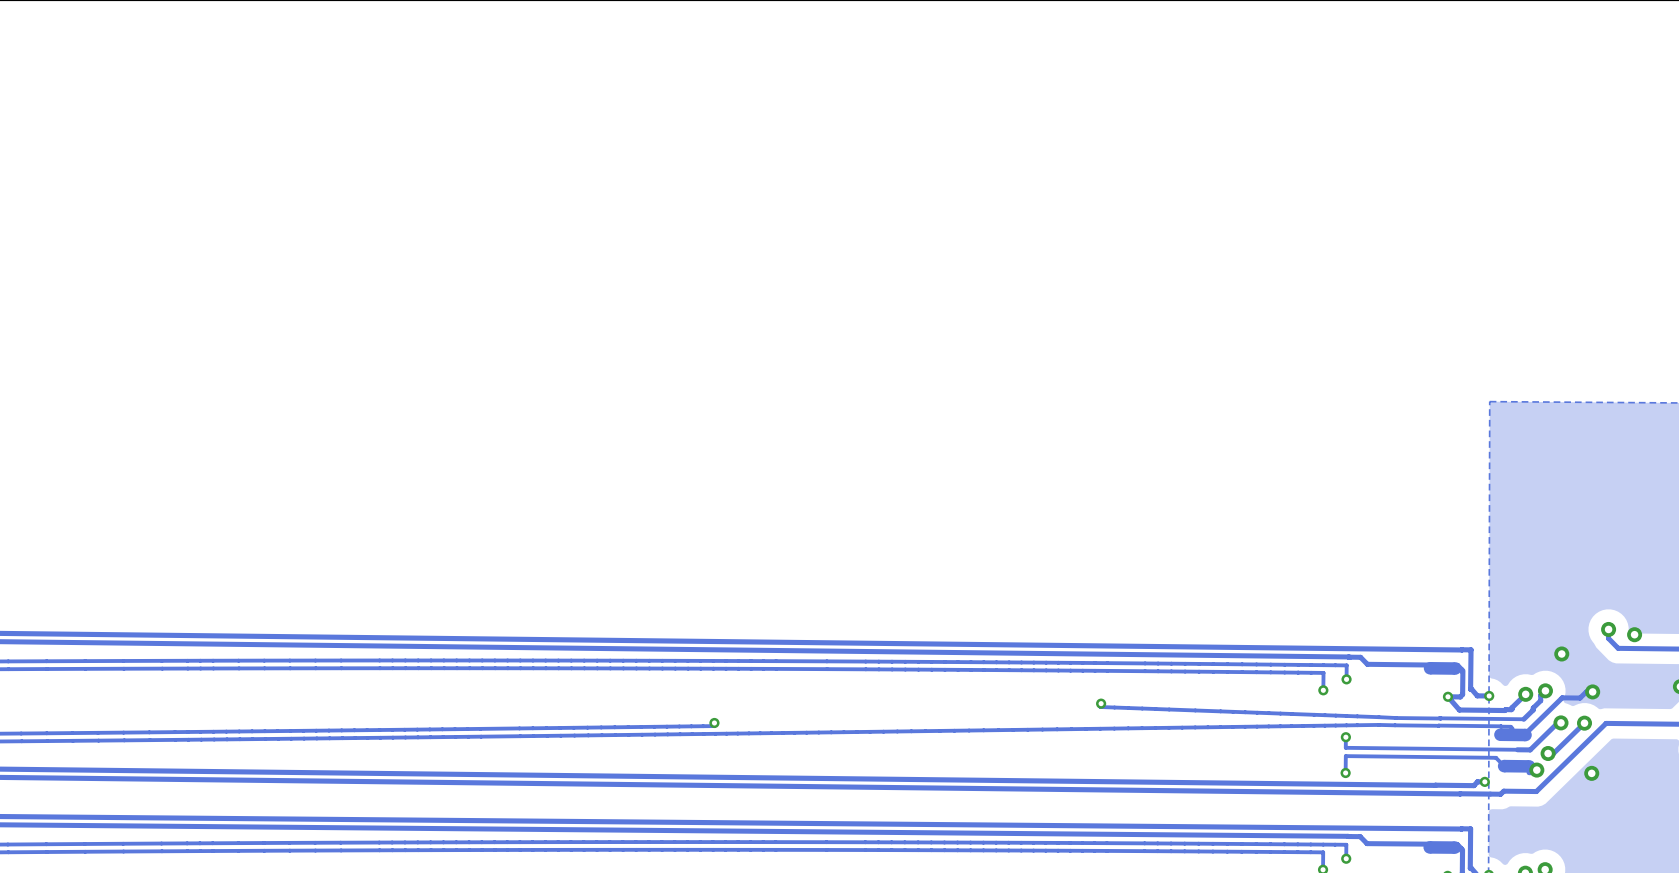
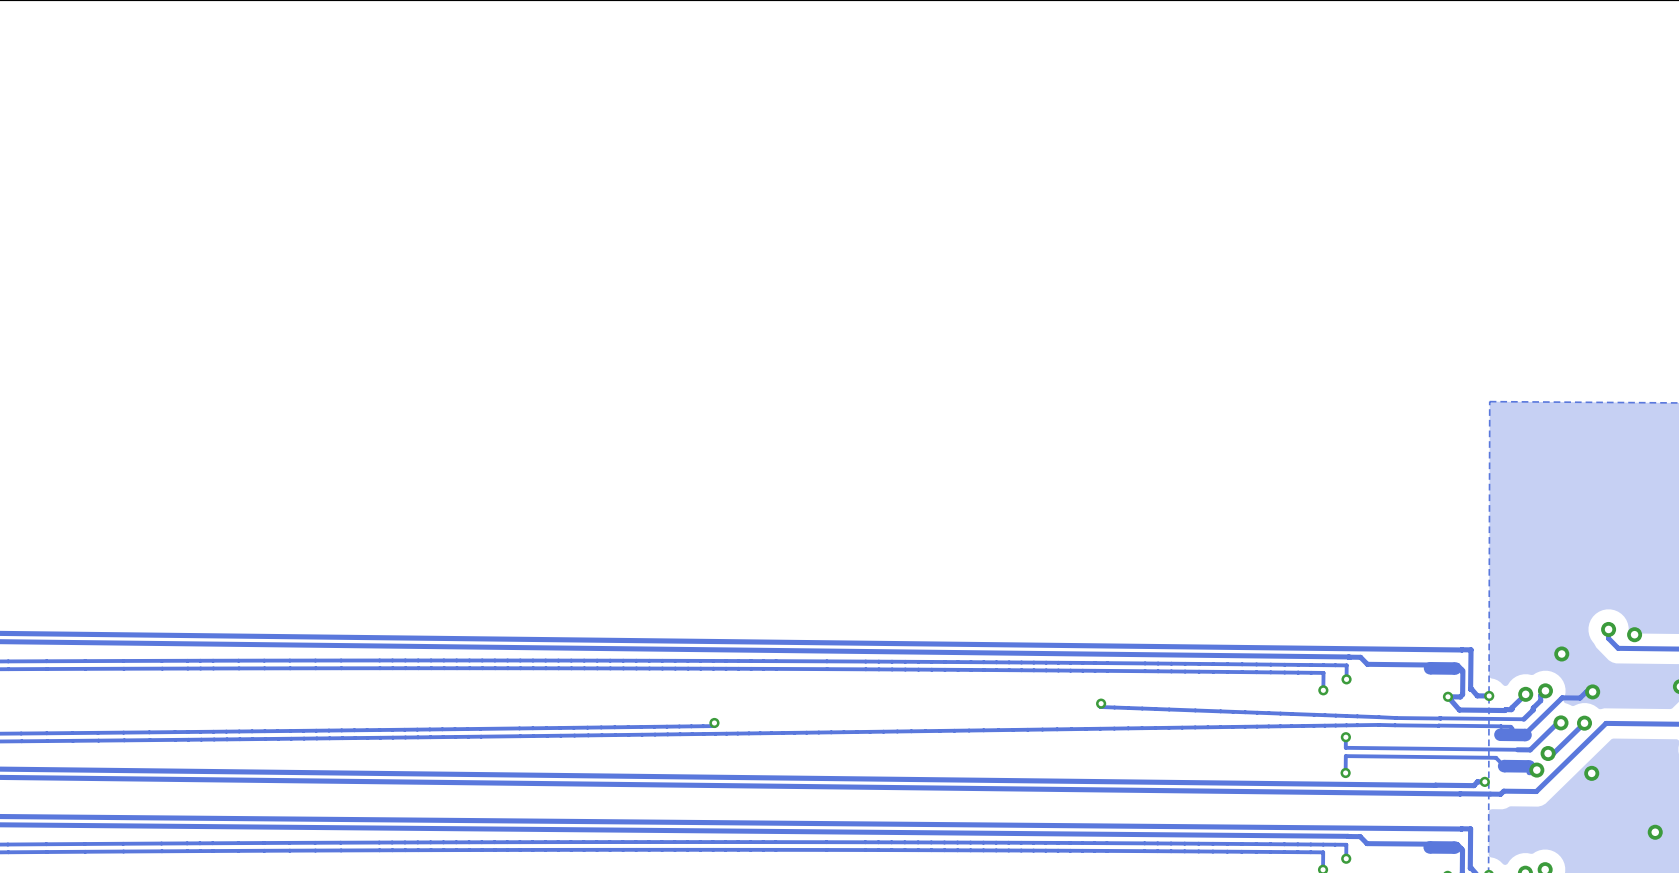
via: none -> (1655, 832)

